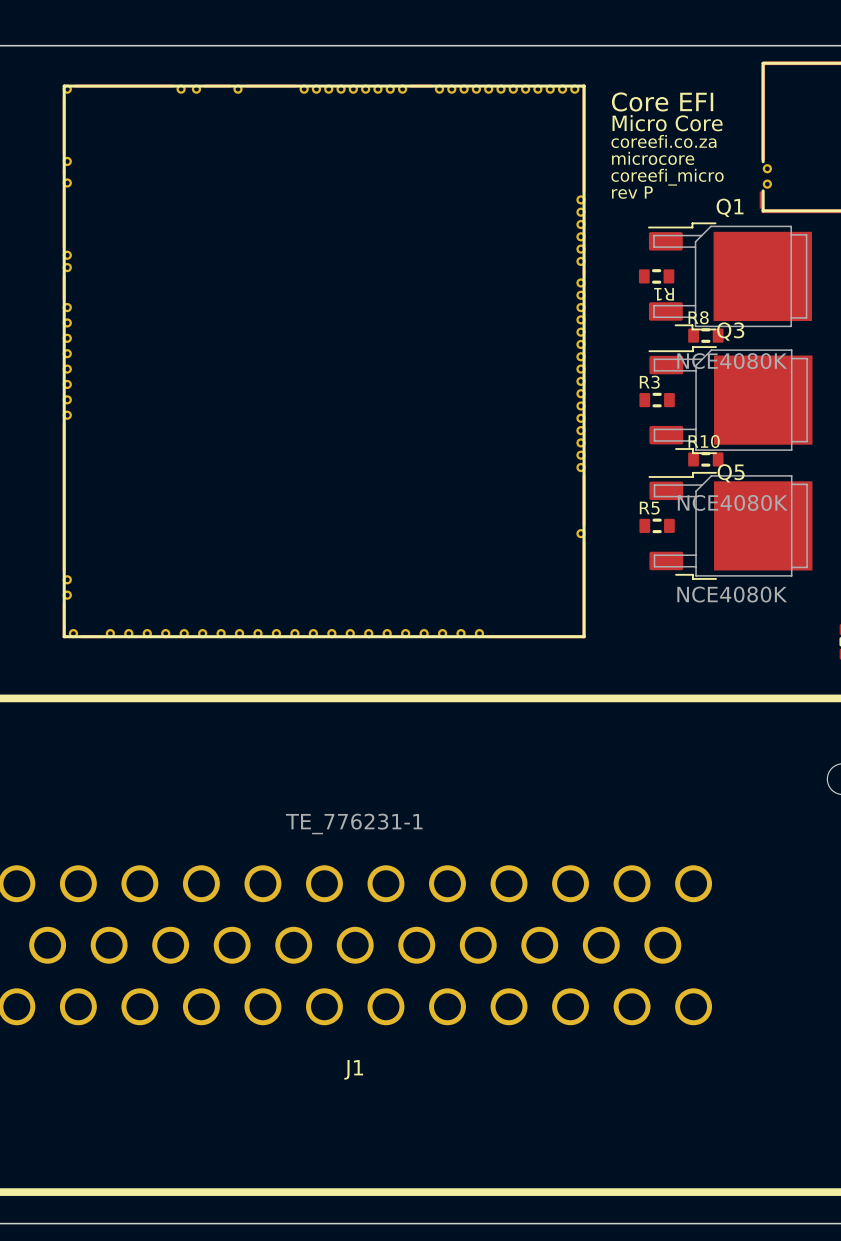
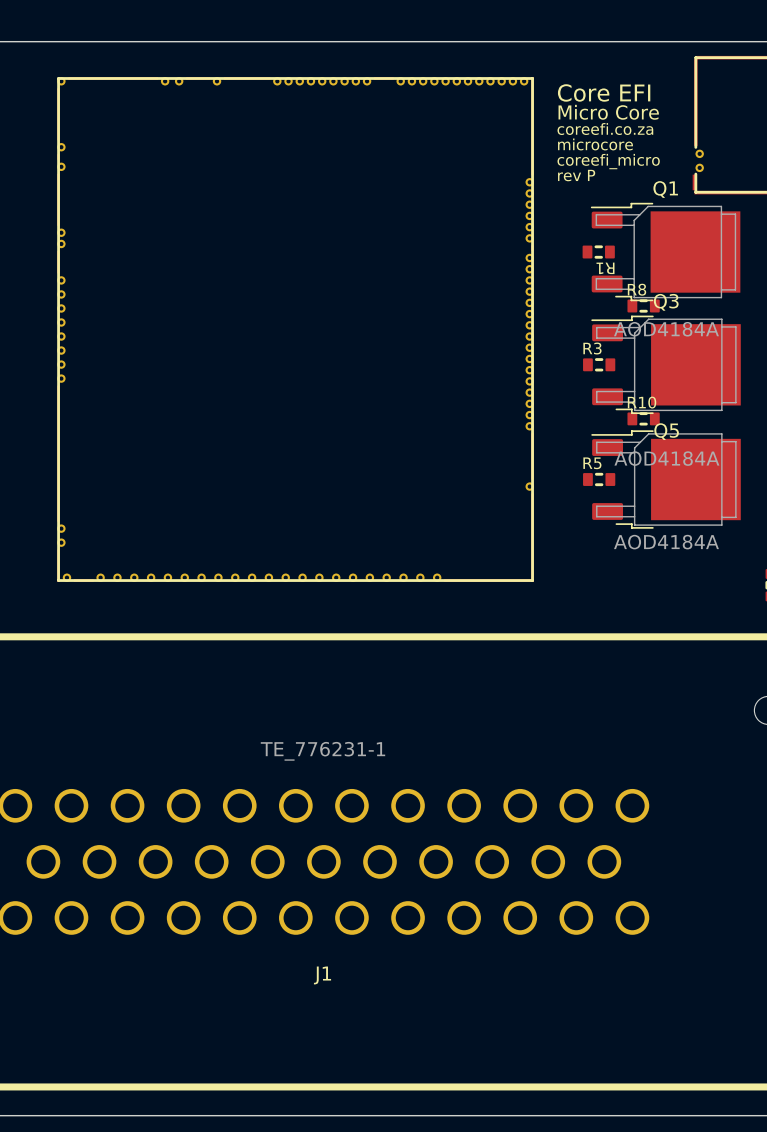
Q1 value: NCE4080K (732, 361) -> AOD4184A (666, 329)
Q3 value: NCE4080K (732, 502) -> AOD4184A (666, 458)
Q5 value: NCE4080K (732, 594) -> AOD4184A (666, 542)

